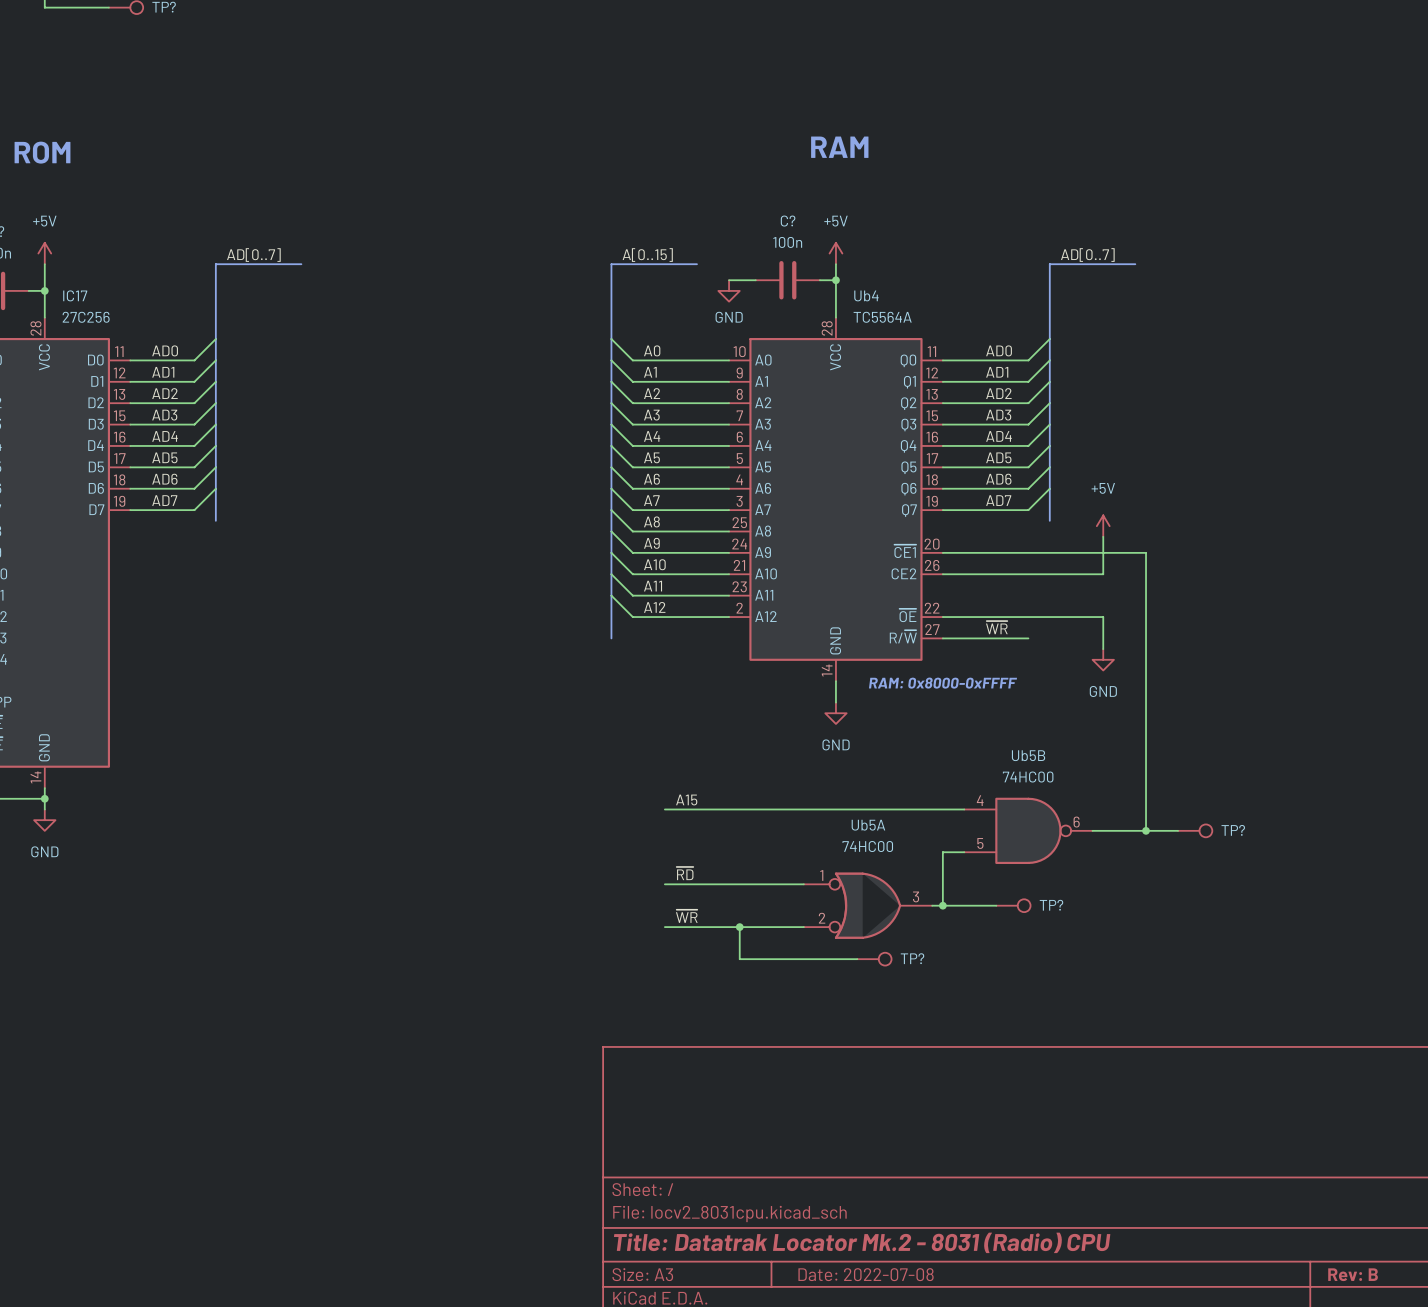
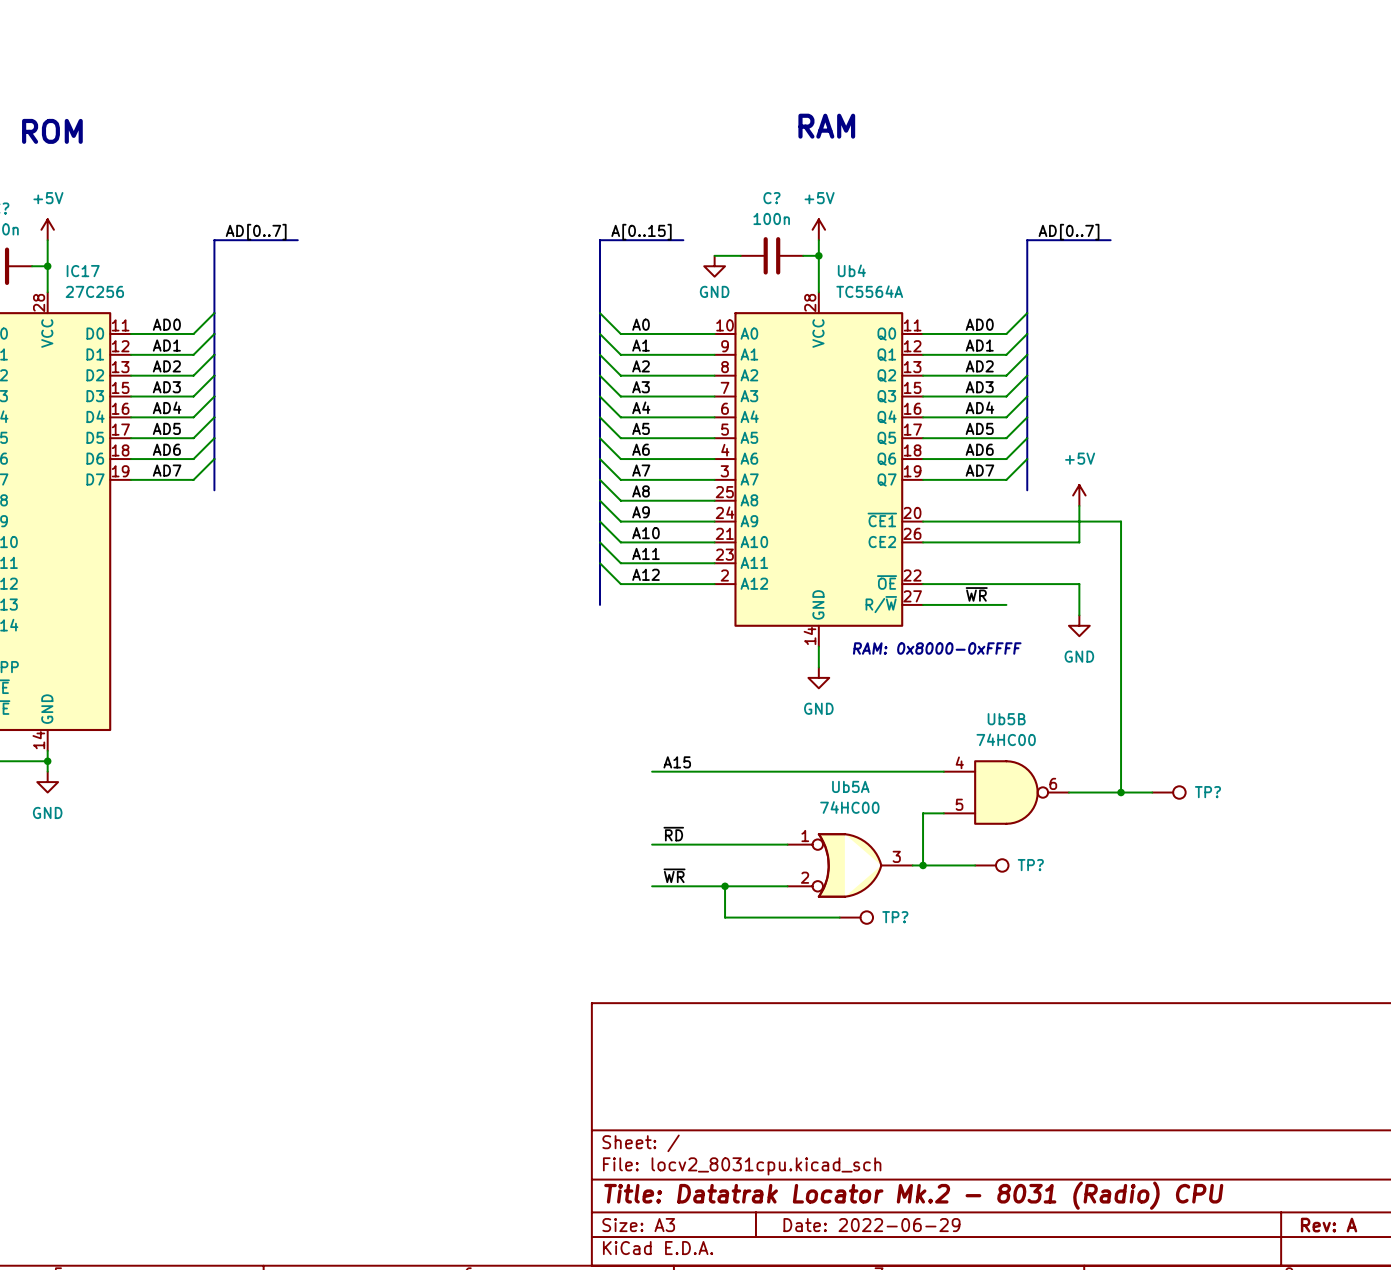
title block: Date: 2022-07-08 (866, 1274) -> Date: 2022-06-29 (871, 1225)
title block: Rev: B (1353, 1274) -> Rev: A (1329, 1225)

